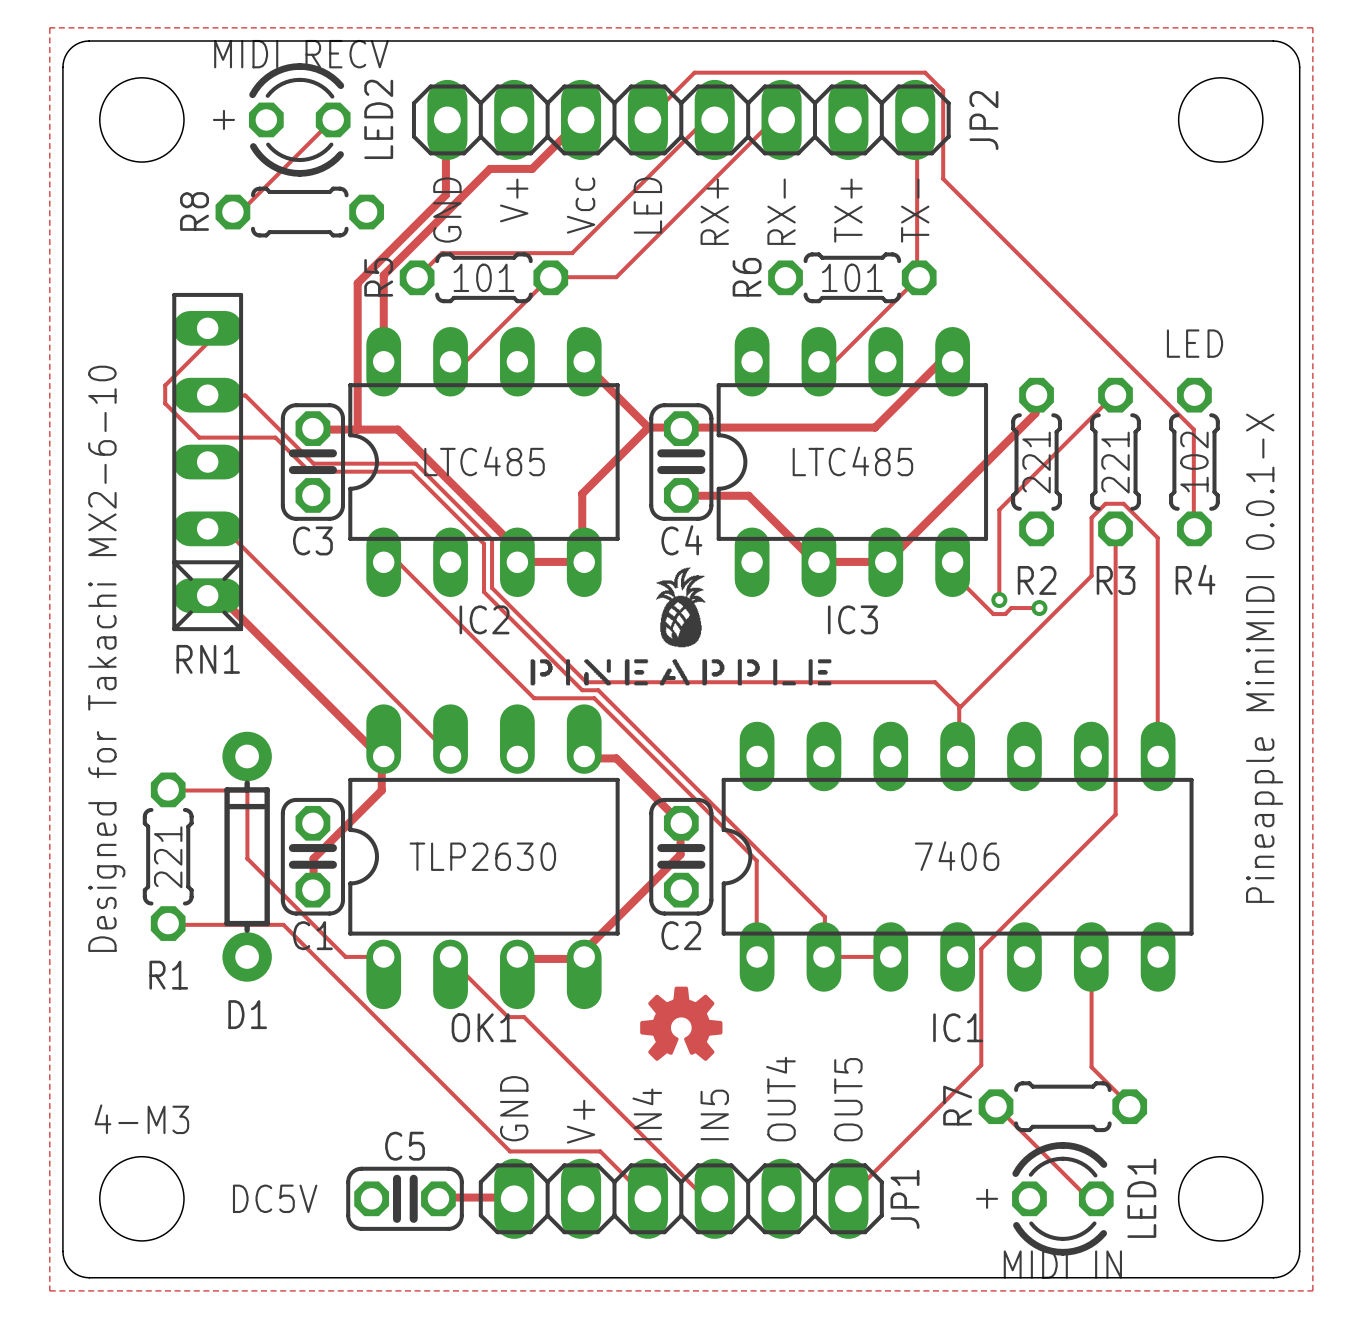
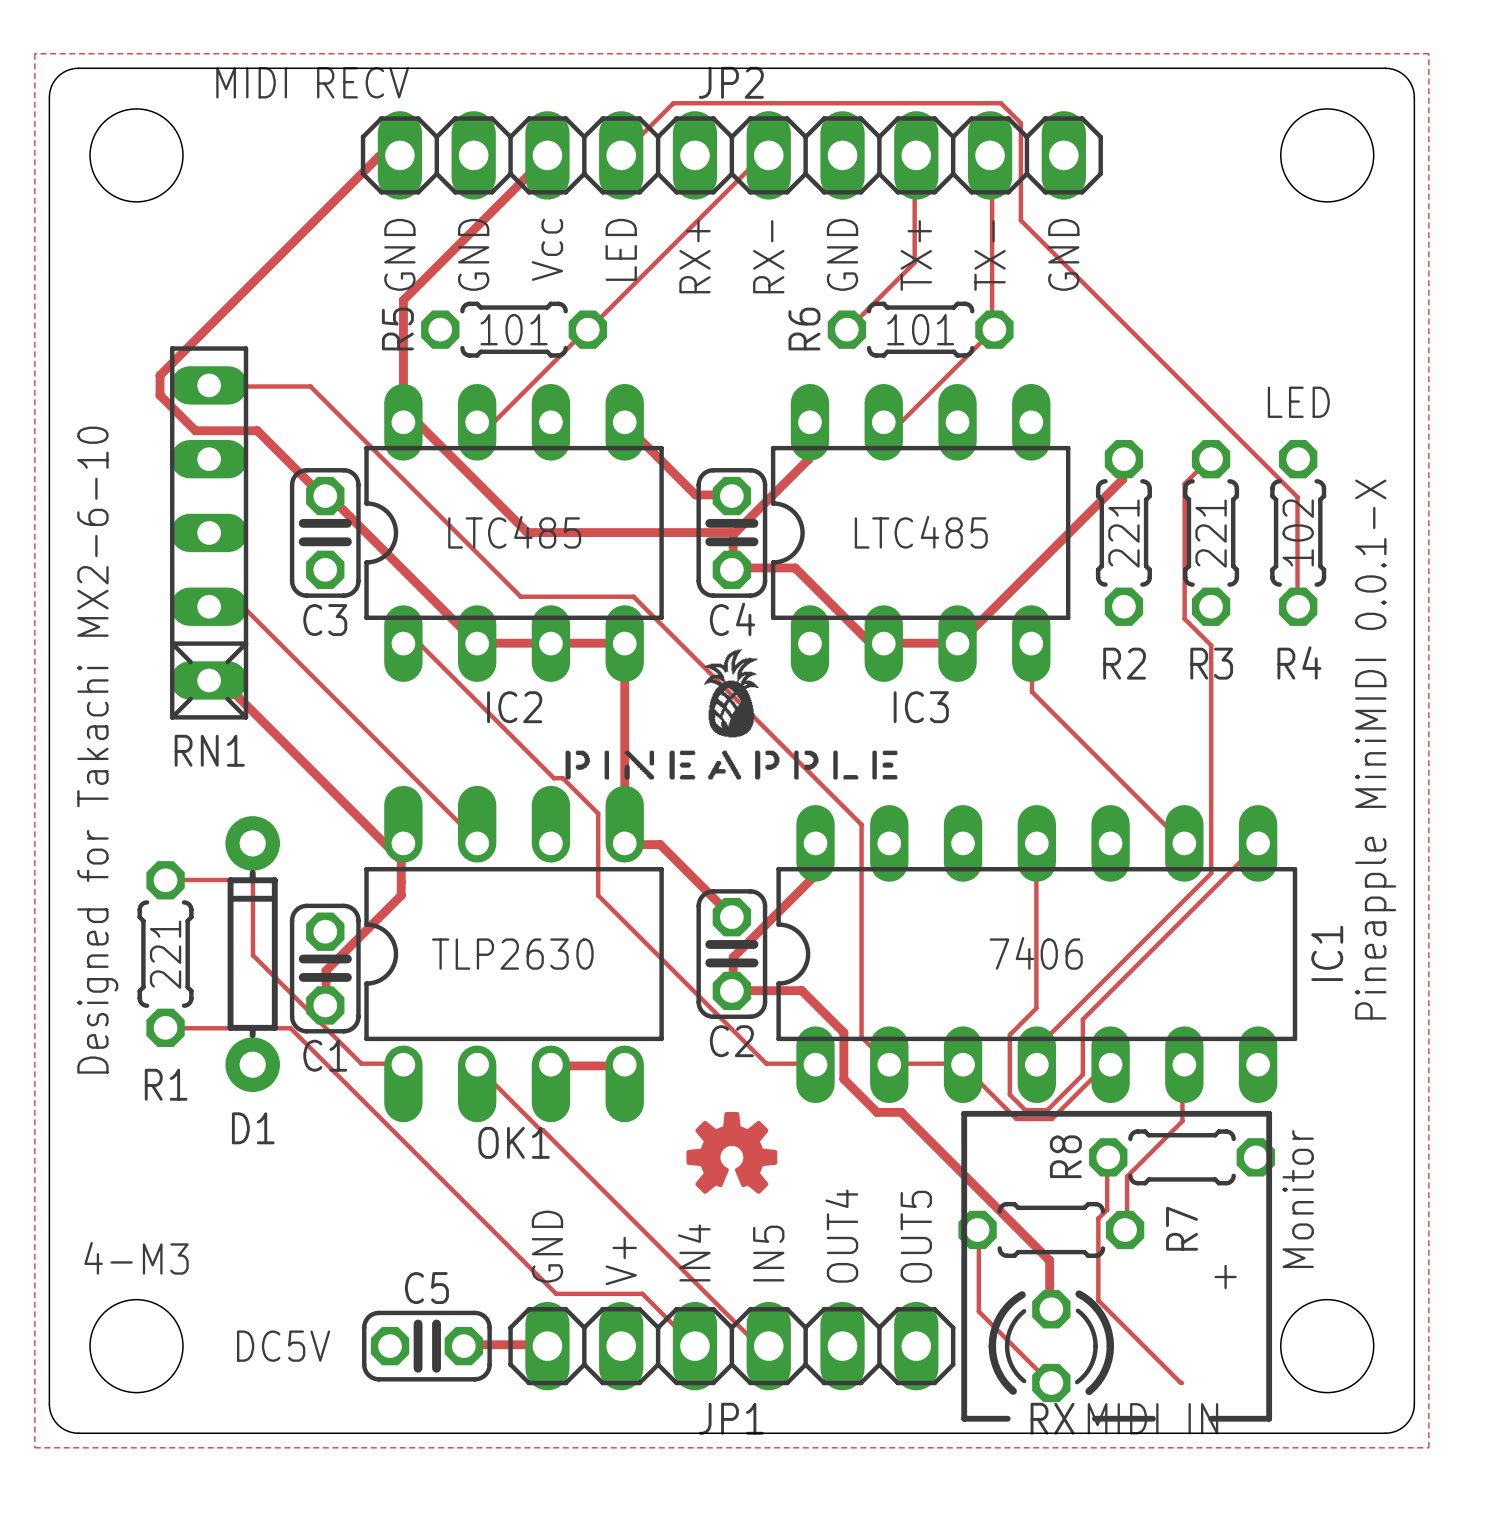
track: (694, 72) (647, 119) -> (746, 103) (673, 103) (621, 155)
JP2 footprint: [411, 79, 951, 161] -> [360, 111, 1103, 200]
text: + (223, 119) -> none
LED2: (299, 119) -> none
track: (333, 119) (241, 211) (232, 212) -> none
track: none -> (399, 155) (379, 156) (160, 375) (160, 395) (195, 430) (257, 430) (321, 494) (325, 496)
track: (447, 119) (445, 194) (357, 283) (357, 429) -> none
track: (581, 119) (532, 168) (490, 168) (383, 275) -> (547, 155) (403, 300) (403, 326)
track: (781, 119) (772, 120) (616, 277) (552, 277) -> (761, 156) (589, 328)
track: none -> (916, 155) (914, 156) (914, 262) (846, 329)
track: (708, 120) (704, 120) (572, 253) (441, 253) (417, 277) -> none
JP2 name position: JP2 (983, 120) -> JP2 (731, 82)
text: V+ (514, 200) -> Vcc (547, 249)
text: Vcc (581, 205) -> LED (621, 249)
text: LED (647, 205) -> RX+ (694, 256)
text: none -> GND (399, 254)
text: none -> GND (1063, 254)
text: RX+ (714, 211) -> RX- (768, 256)
text: RX- (781, 211) -> GND (842, 254)
R8 position: (299, 212) -> (1182, 1157)
track: (207, 328) (207, 343) (165, 385) (165, 403) (199, 437) (275, 437) (309, 471) (411, 471) (484, 543) (484, 592) (582, 690) (598, 690) (824, 916) (823, 956) (890, 956) -> (209, 385) (310, 386) (520, 596) (633, 596) (861, 824) (861, 1037) (889, 1064) (961, 1063) (1016, 1119) (1051, 1119) (1104, 1065) (1110, 1064)
track: none -> (403, 422) (416, 421) (527, 532) (730, 532) (733, 534)
track: none -> (809, 422) (808, 459) (733, 534)
track: (952, 361) (939, 363) (875, 427) (681, 428) -> none
track: (207, 395) (245, 395) (313, 463) (415, 463) (492, 539) (492, 587) (586, 682) (935, 682) (960, 707) -> none
track: (1091, 417) (999, 509) (999, 600) -> (1184, 483) (1184, 594)
track: (648, 427) (582, 493) (582, 557) (584, 562) -> (731, 917) (660, 844) (624, 844) (624, 643)
track: (317, 429) (397, 429) (516, 547) (516, 561) -> (330, 497) (476, 643) (549, 643)
track: (681, 495) (748, 495) (814, 561) -> (733, 534) (731, 569) (737, 567) (795, 567) (870, 643) (879, 643)
track: (1091, 517) (1105, 503) (1123, 503) (1157, 537) (1157, 756) -> none
track: (1115, 528) (1115, 563) -> (1184, 618) (1211, 645)
track: (225, 529) (450, 756) -> (228, 607) (244, 607) (478, 842) (477, 843)
track: (1091, 539) (1091, 575) (959, 708) (959, 756) (957, 756) -> none
track: (953, 573) (993, 614) (1005, 614) (1011, 608) (1039, 608) -> (1031, 656) (1031, 691) (1184, 843)
via: (999, 600) -> none
via: (1039, 608) -> none
track: (520, 684) (534, 698) (594, 698) (756, 860) (756, 956) -> (553, 778) (562, 778) (598, 813) (598, 895) (766, 1063) (815, 1064)
track: none -> (815, 843) (815, 875) (733, 957) (731, 990) (801, 990) (843, 1032) (843, 1079) (877, 1112) (901, 1112) (1049, 1260) (1049, 1307) (1051, 1309)
track: none -> (1036, 843) (1036, 1008) (1009, 1034) (1009, 1094) (1025, 1110) (1047, 1110) (1082, 1074) (1082, 1019) (1258, 843)
track: (584, 756) (584, 758) (616, 758) (681, 823) (680, 854) (586, 948) (586, 954) (582, 958) (518, 958) (517, 956) -> none
track: (1115, 770) (1115, 814) (981, 948) (981, 1065) (848, 1198) -> (1211, 873) (1038, 1045) (1038, 1063) (1036, 1064)
track: none -> (252, 880) (165, 880)
track: (168, 789) (247, 790) -> none
track: (247, 844) (247, 858) (345, 956) (383, 956) -> (252, 955) (361, 1063) (403, 1064)
R1 position: (168, 856) -> (165, 954)
D1 position: (247, 856) -> (252, 954)
text position: TLP2630 (482, 856) -> TLP2630 (512, 954)
OK1 position: (483, 856) -> (514, 954)
C2 position: (681, 856) -> (731, 954)
text position: 7406 (957, 856) -> 7406 (1036, 953)
IC1 position: (957, 856) -> (1036, 954)
text position: 221 (168, 857) -> 221 (165, 954)
track: (168, 923) (283, 924) (510, 1151) (522, 1151) -> (165, 1027) (290, 1028) (556, 1293)
track: none -> (550, 1064) (624, 1064)
track: none -> (1184, 1064) (1182, 1065) (1182, 1121) (1127, 1176) (1127, 1229) (1125, 1229)
track: (450, 956) (449, 958) (508, 1017) (524, 1017) -> (477, 1064) (540, 1130) (558, 1145)
track: (1091, 956) (1091, 1067) (1129, 1106) -> none
IC1 name rotation: 0° (958, 1027) -> 90° counterclockwise (1327, 953)
IC1 name position: IC1 (958, 1027) -> IC1 (1327, 953)
track: none -> (1108, 1157) (1107, 1209) (1098, 1218) (1098, 1300) (1182, 1383)
text: none -> Monitor (1298, 1199)
track: none -> (977, 1229) (978, 1311) (1051, 1383)
R7 name position: R7 (957, 1105) -> R7 (1182, 1228)
track: (996, 1106) (1087, 1197) (1096, 1198) -> none
R7 position: (1062, 1106) -> (1051, 1229)
RX: none -> (1051, 1346)
text rotation: 0° (987, 1198) -> 90° clockwise (1225, 1276)
text position: + (987, 1198) -> + (1225, 1276)
LED1: (1062, 1198) -> none
JP1 name rotation: 0° (904, 1199) -> 90° clockwise (731, 1418)
JP1 name position: JP1 (904, 1199) -> JP1 (731, 1418)
line: none -> (1007, 1418) (964, 1418) (964, 1113) (1269, 1113) (1269, 1418) (1211, 1418)
line: none -> (1094, 1418) (1152, 1418)

